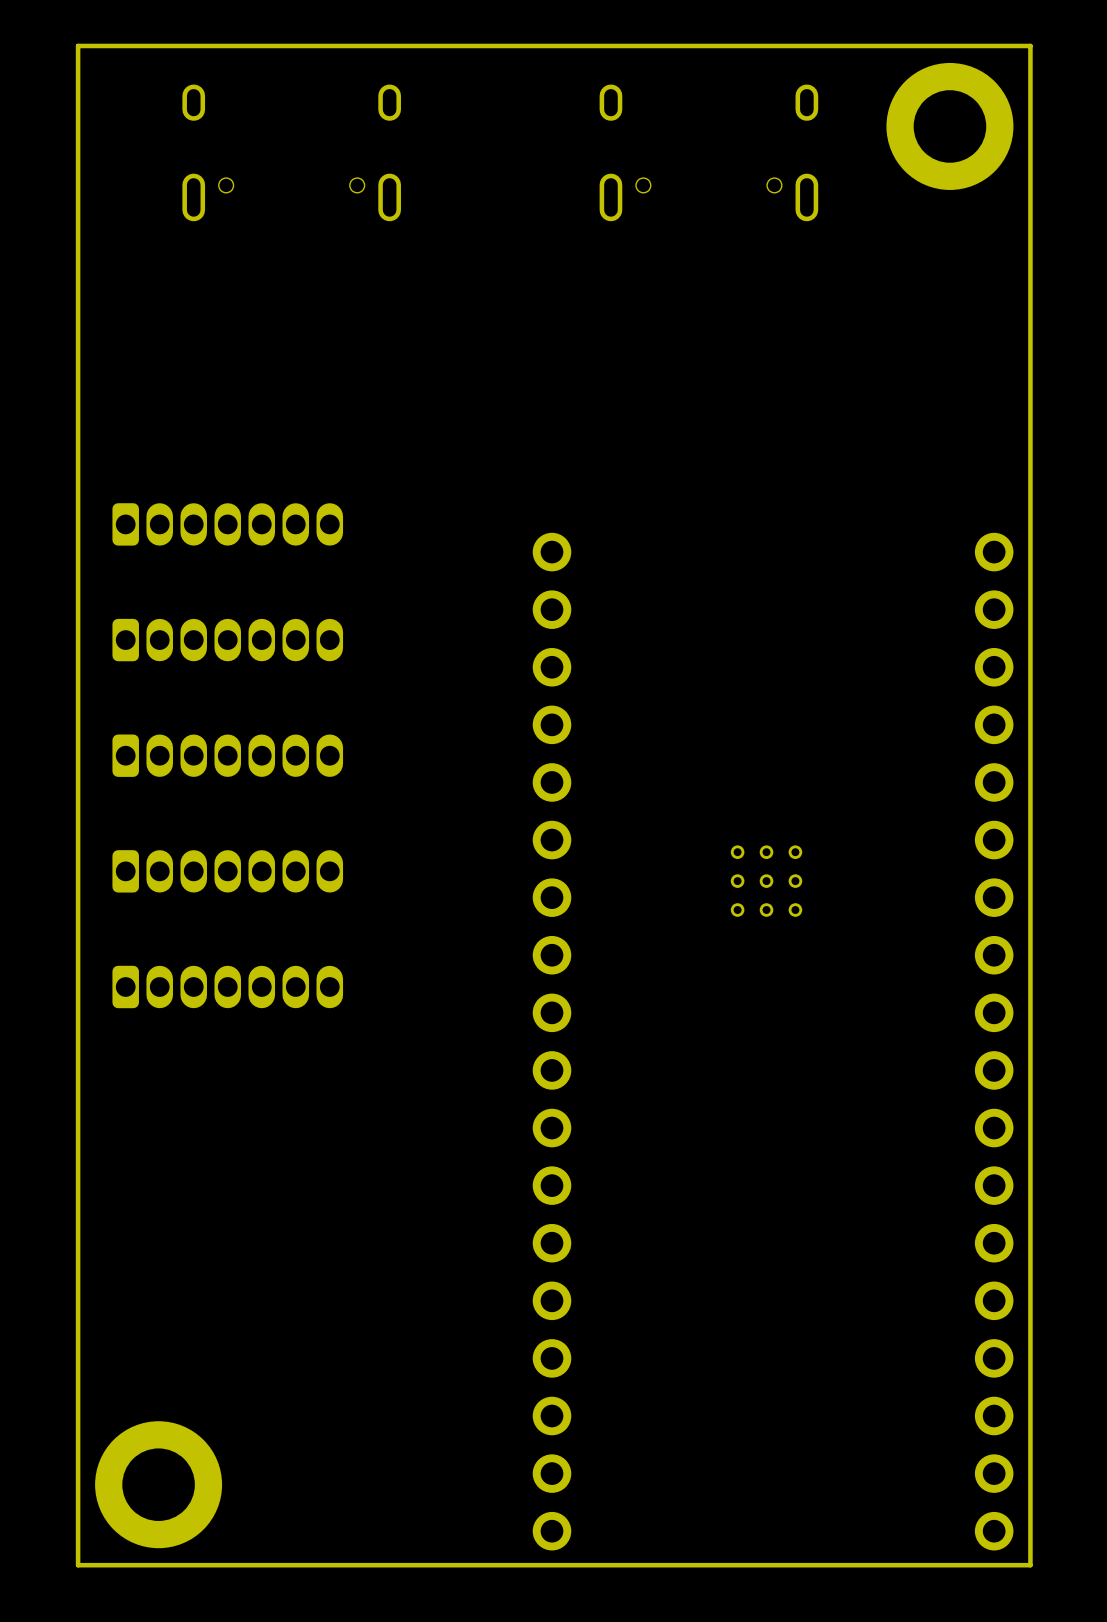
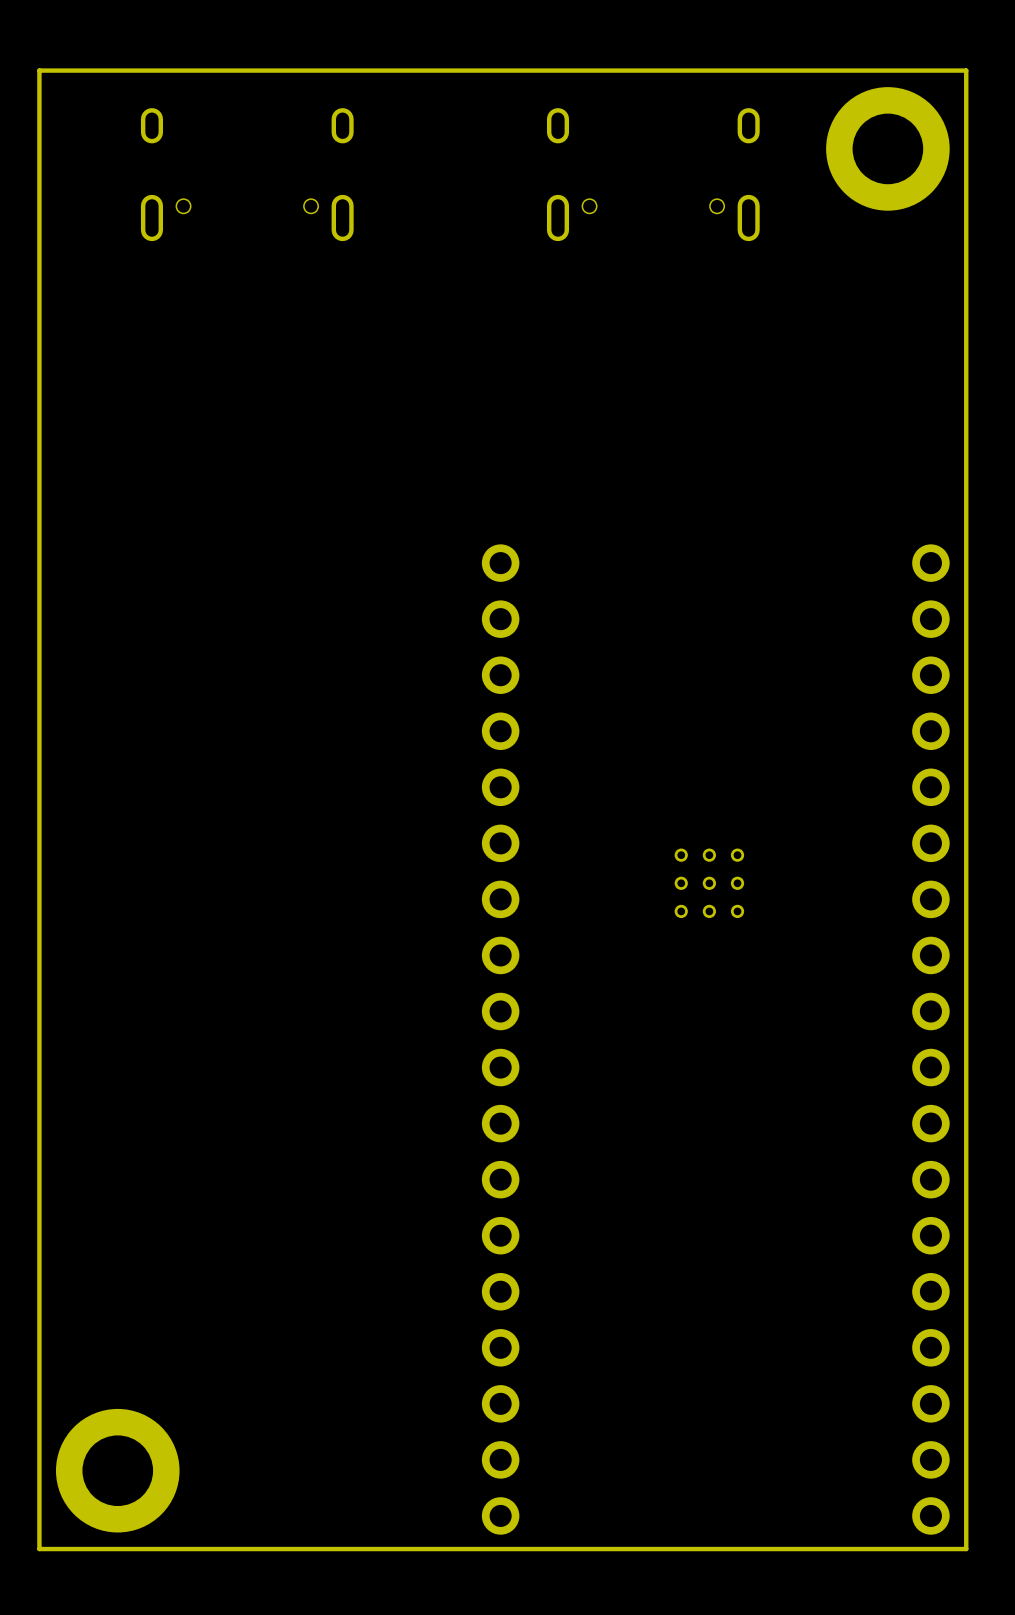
part: (227, 524) -> none
part: (227, 640) -> none
part: (227, 755) -> none
part: (227, 871) -> none
part: (227, 986) -> none

